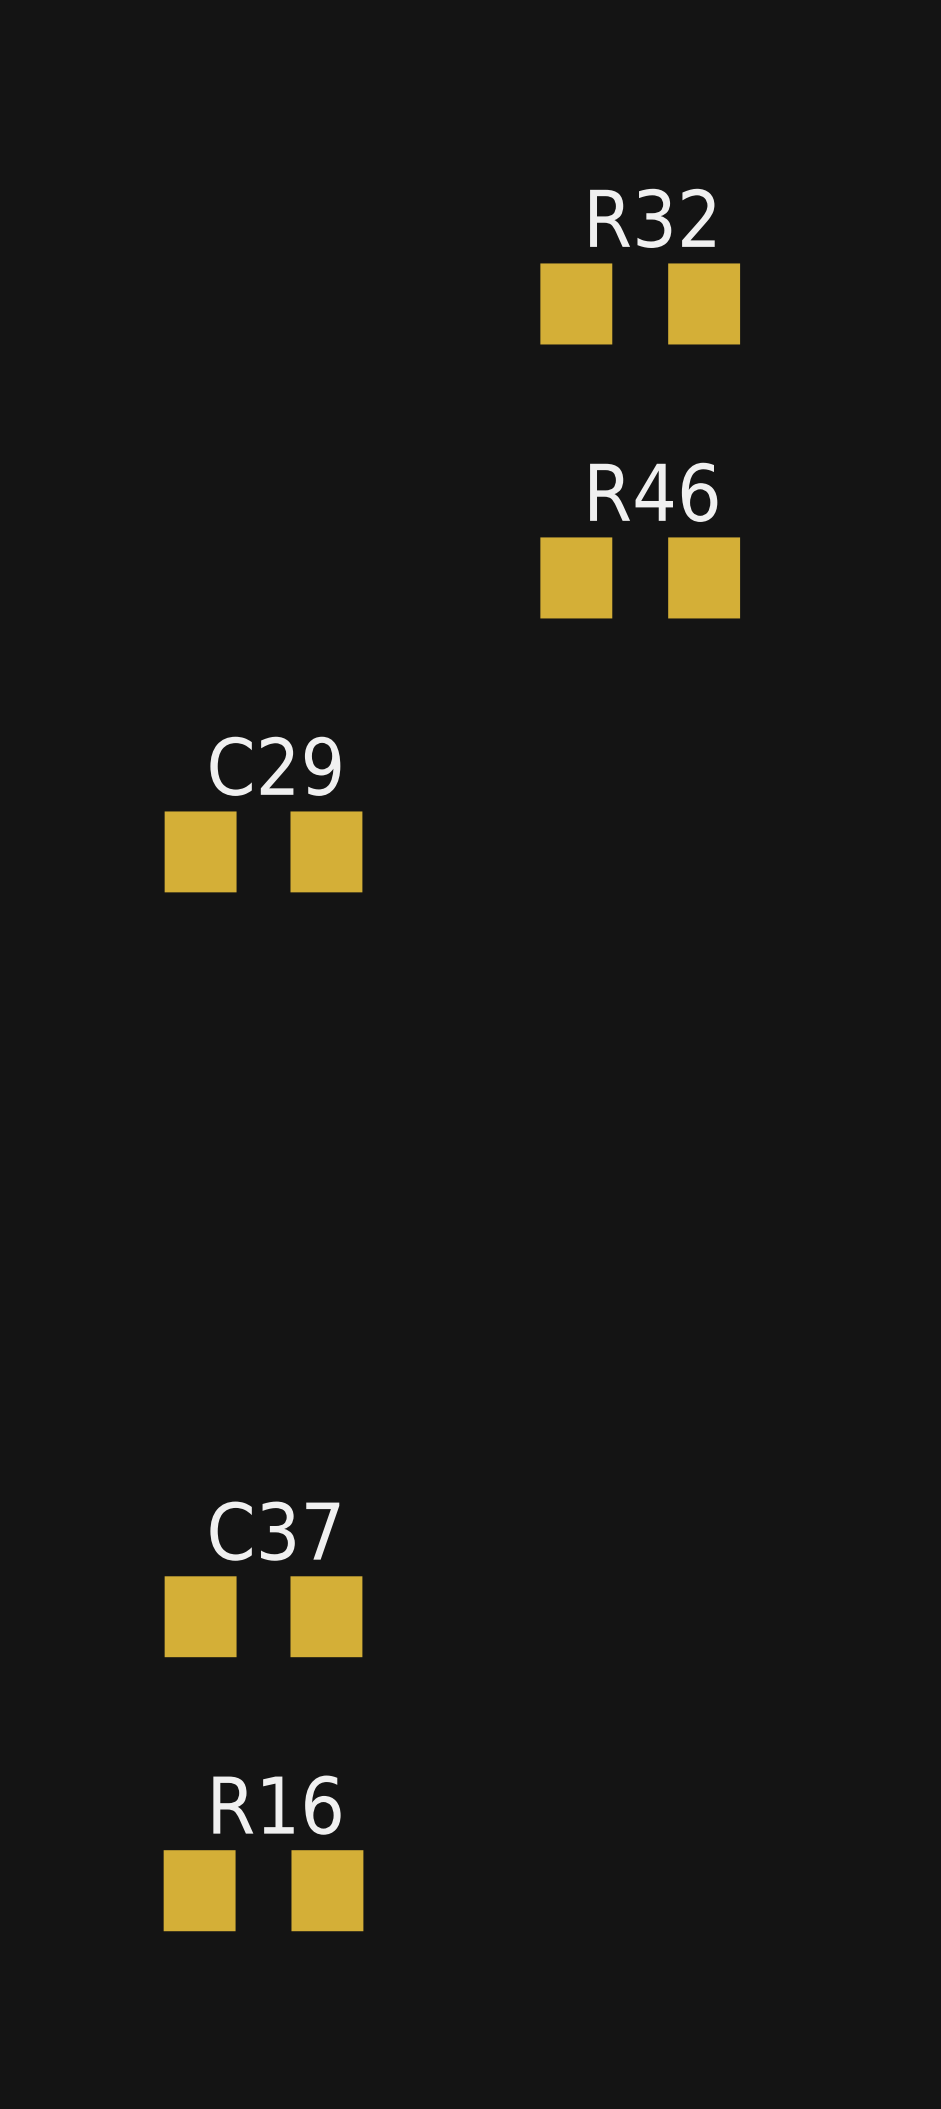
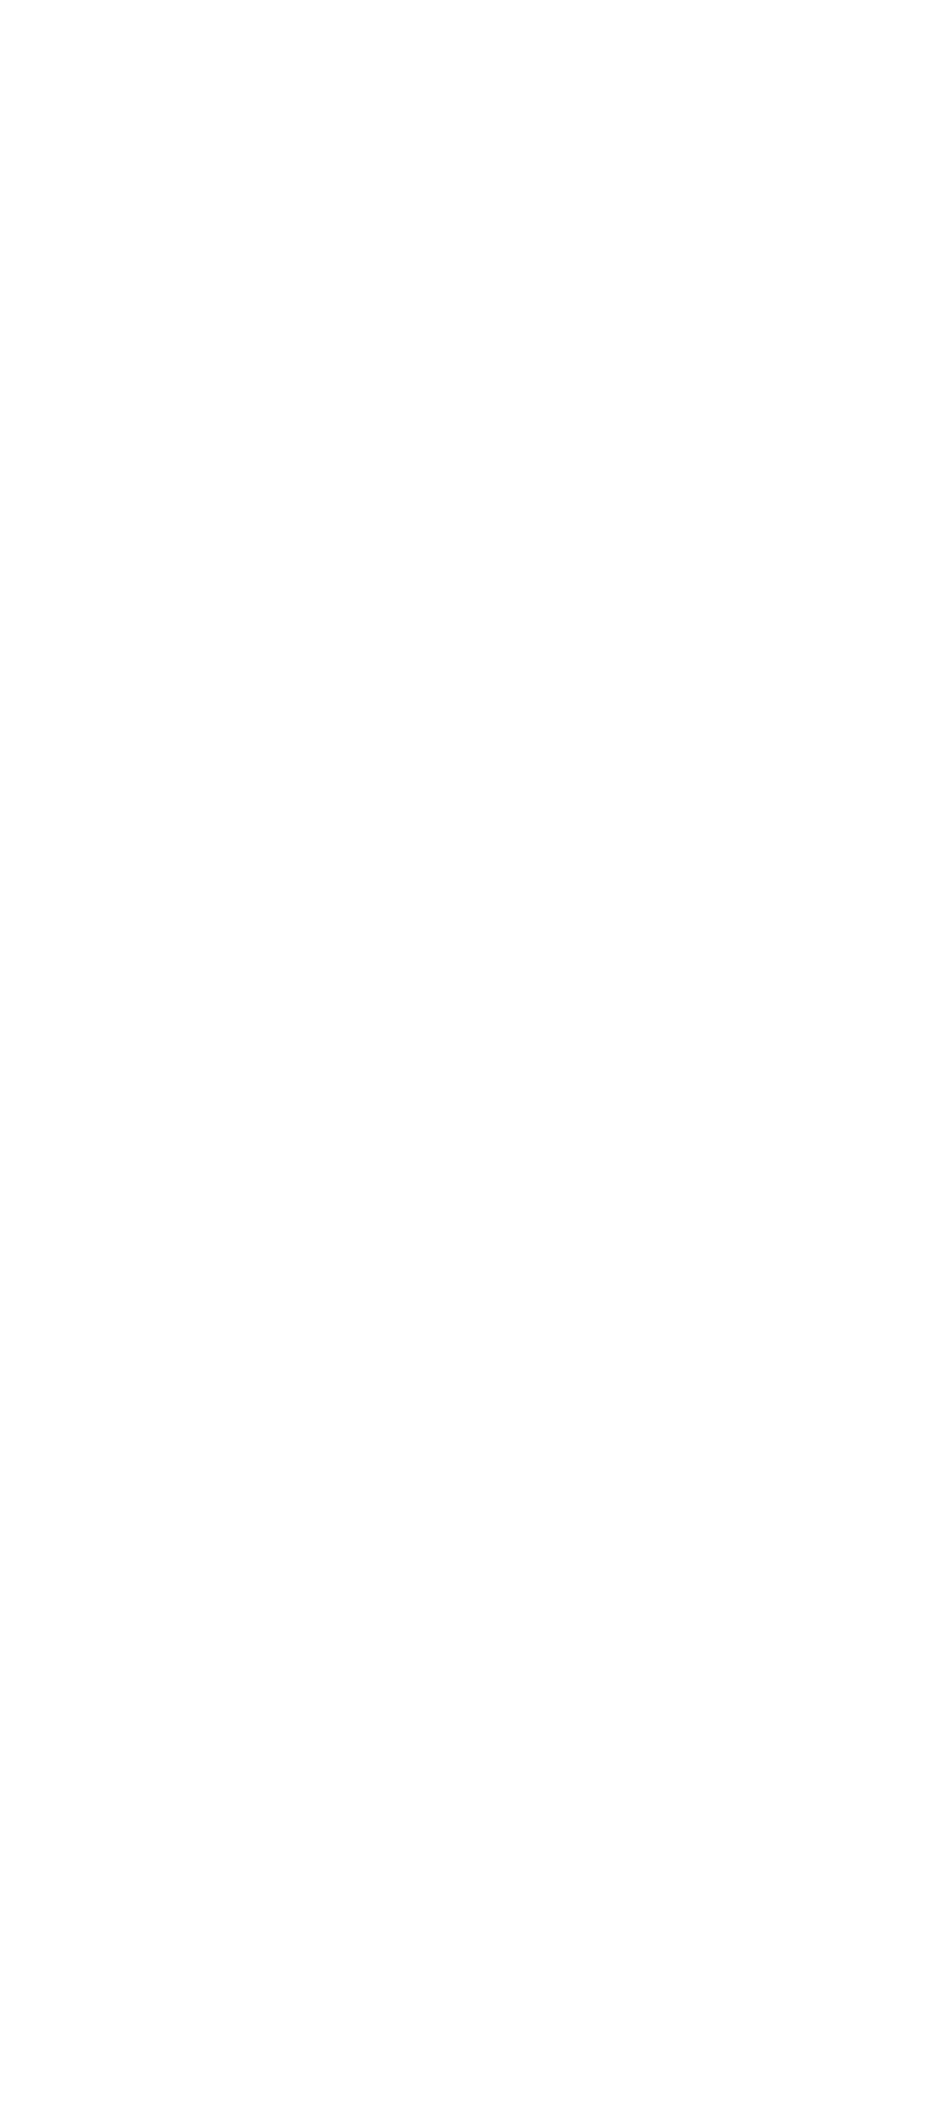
R32: (640, 303) -> none
R46: (640, 577) -> none
C29: (263, 851) -> none
C37: (263, 1616) -> none
R16: (263, 1890) -> none

